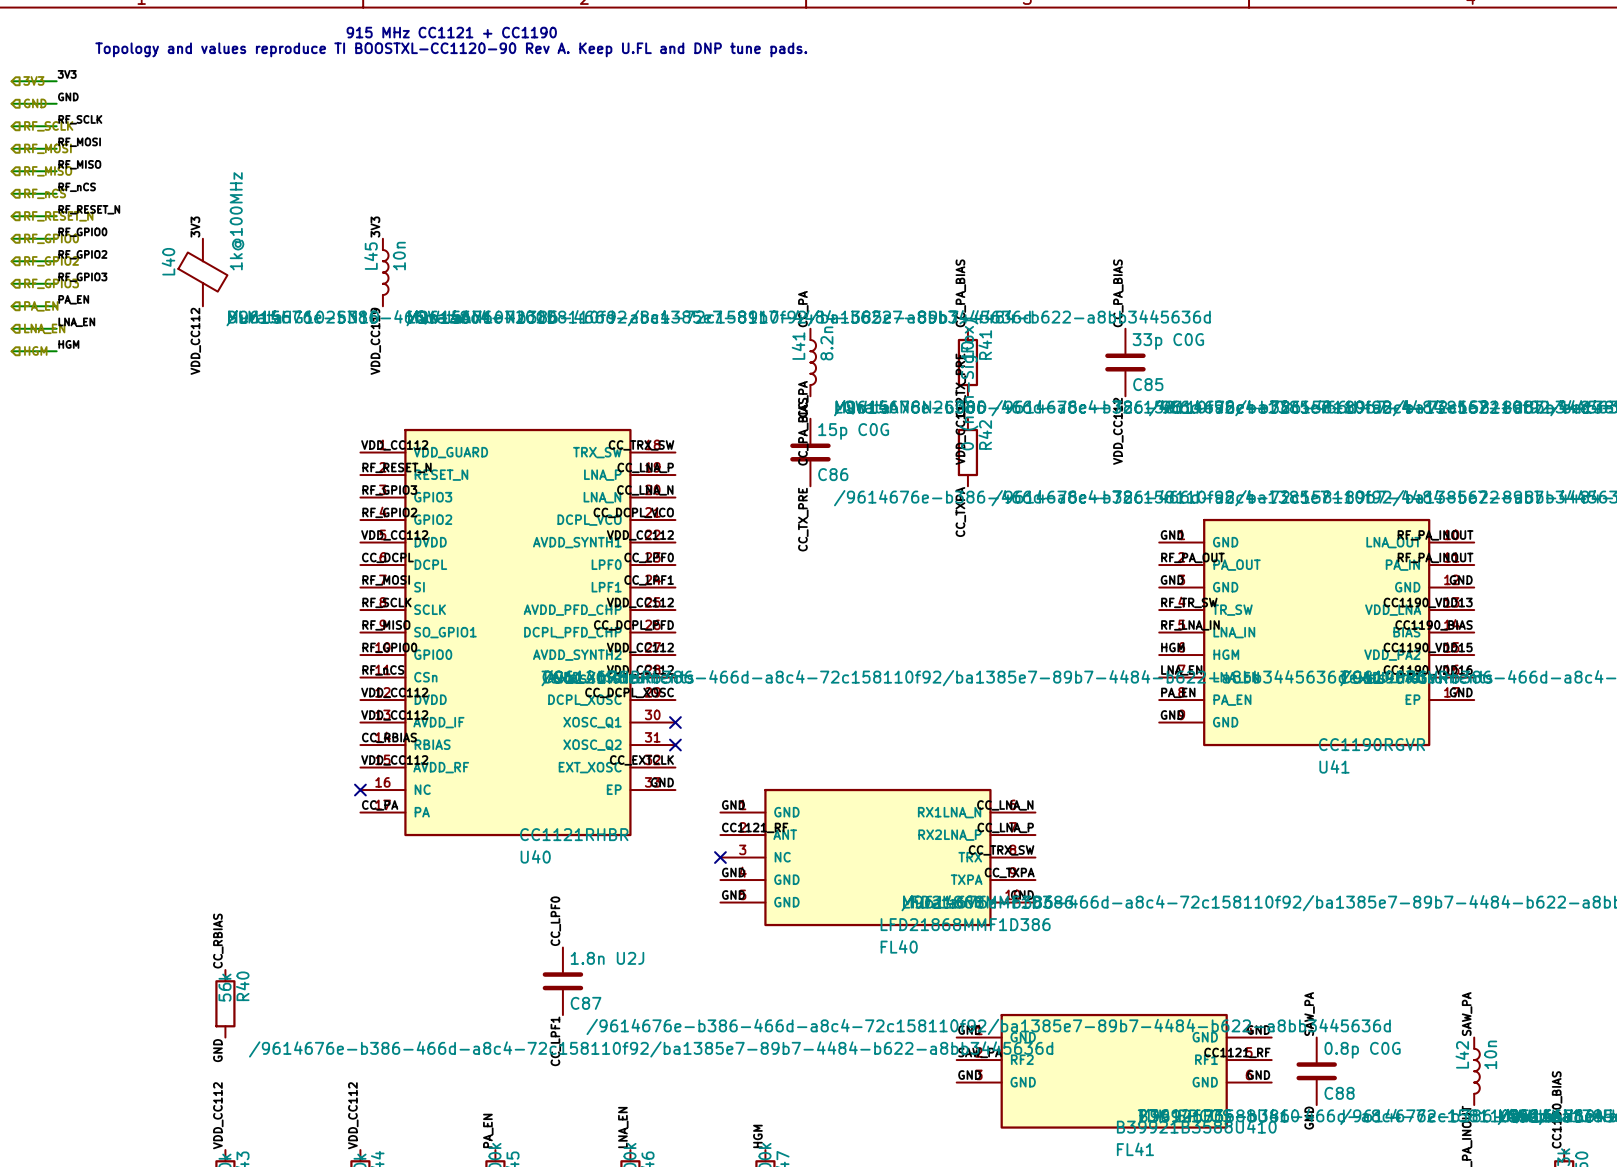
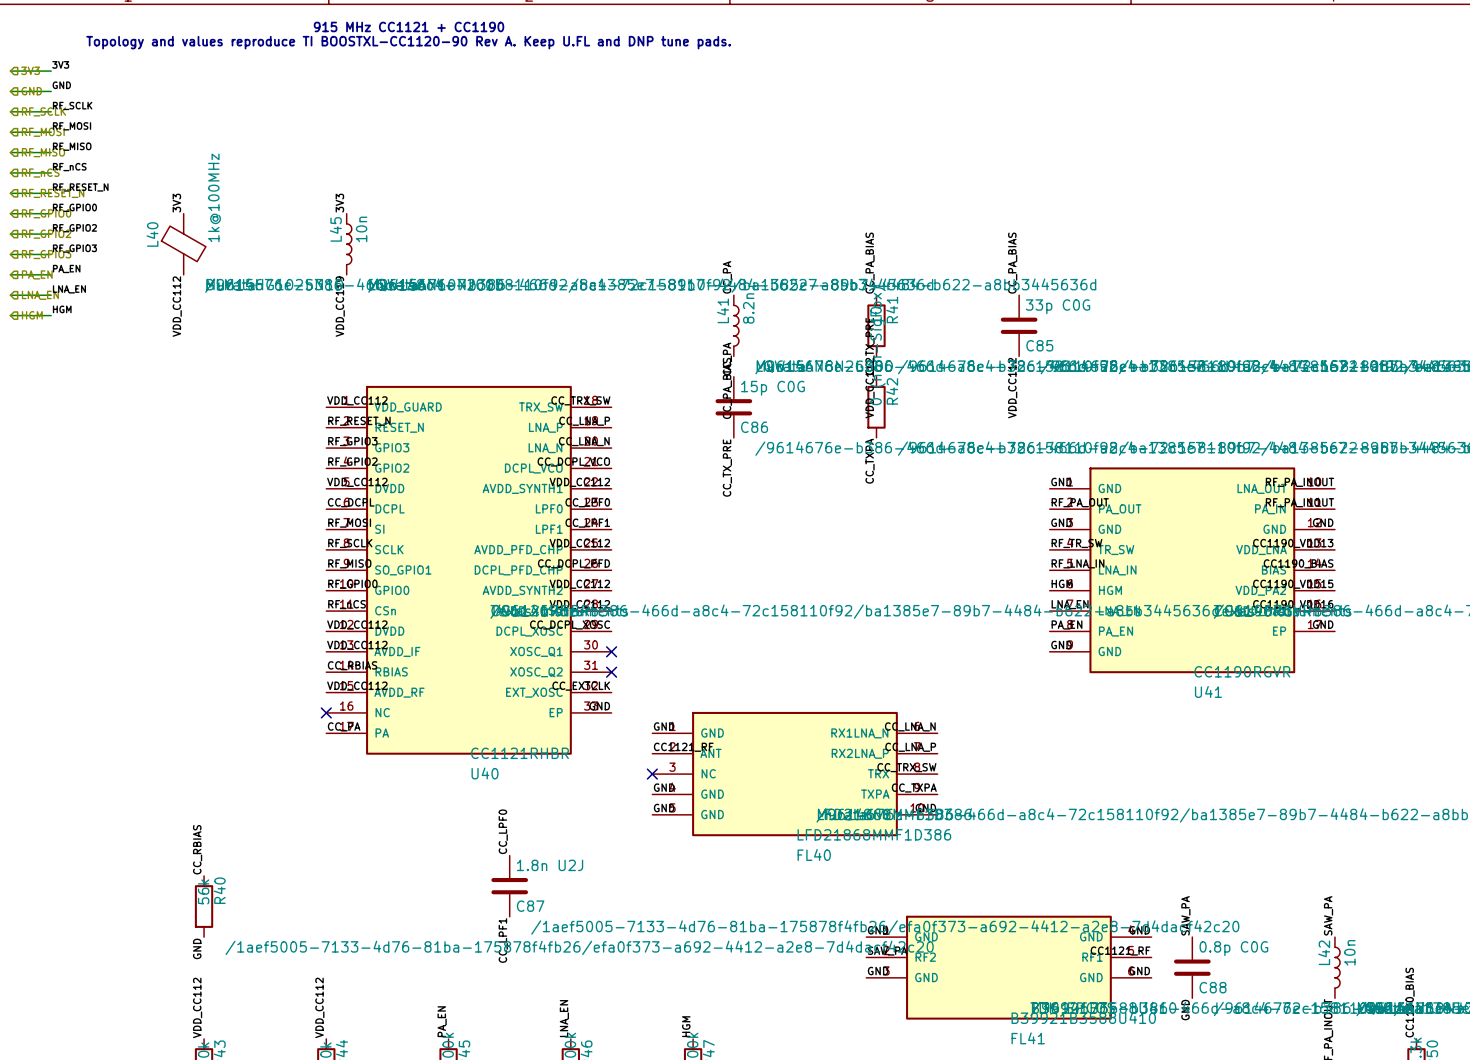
C87 text: /9614676e-b386-466d-a8c4-72c158110f92/ba1385e7-89b7-4484-b622-a8bb3445636d (988, 1026) -> /1aef5005-7133-4d76-81ba-175878f4fb26/efa0f373-a692-4412-a2e8-7d4dacf42c20 (885, 927)
R40 text: /9614676e-b386-466d-a8c4-72c158110f92/ba1385e7-89b7-4484-b622-a8bb3445636d (651, 1049) -> /1aef5005-7133-4d76-81ba-175878f4fb26/efa0f373-a692-4412-a2e8-7d4dacf42c20 (579, 947)

